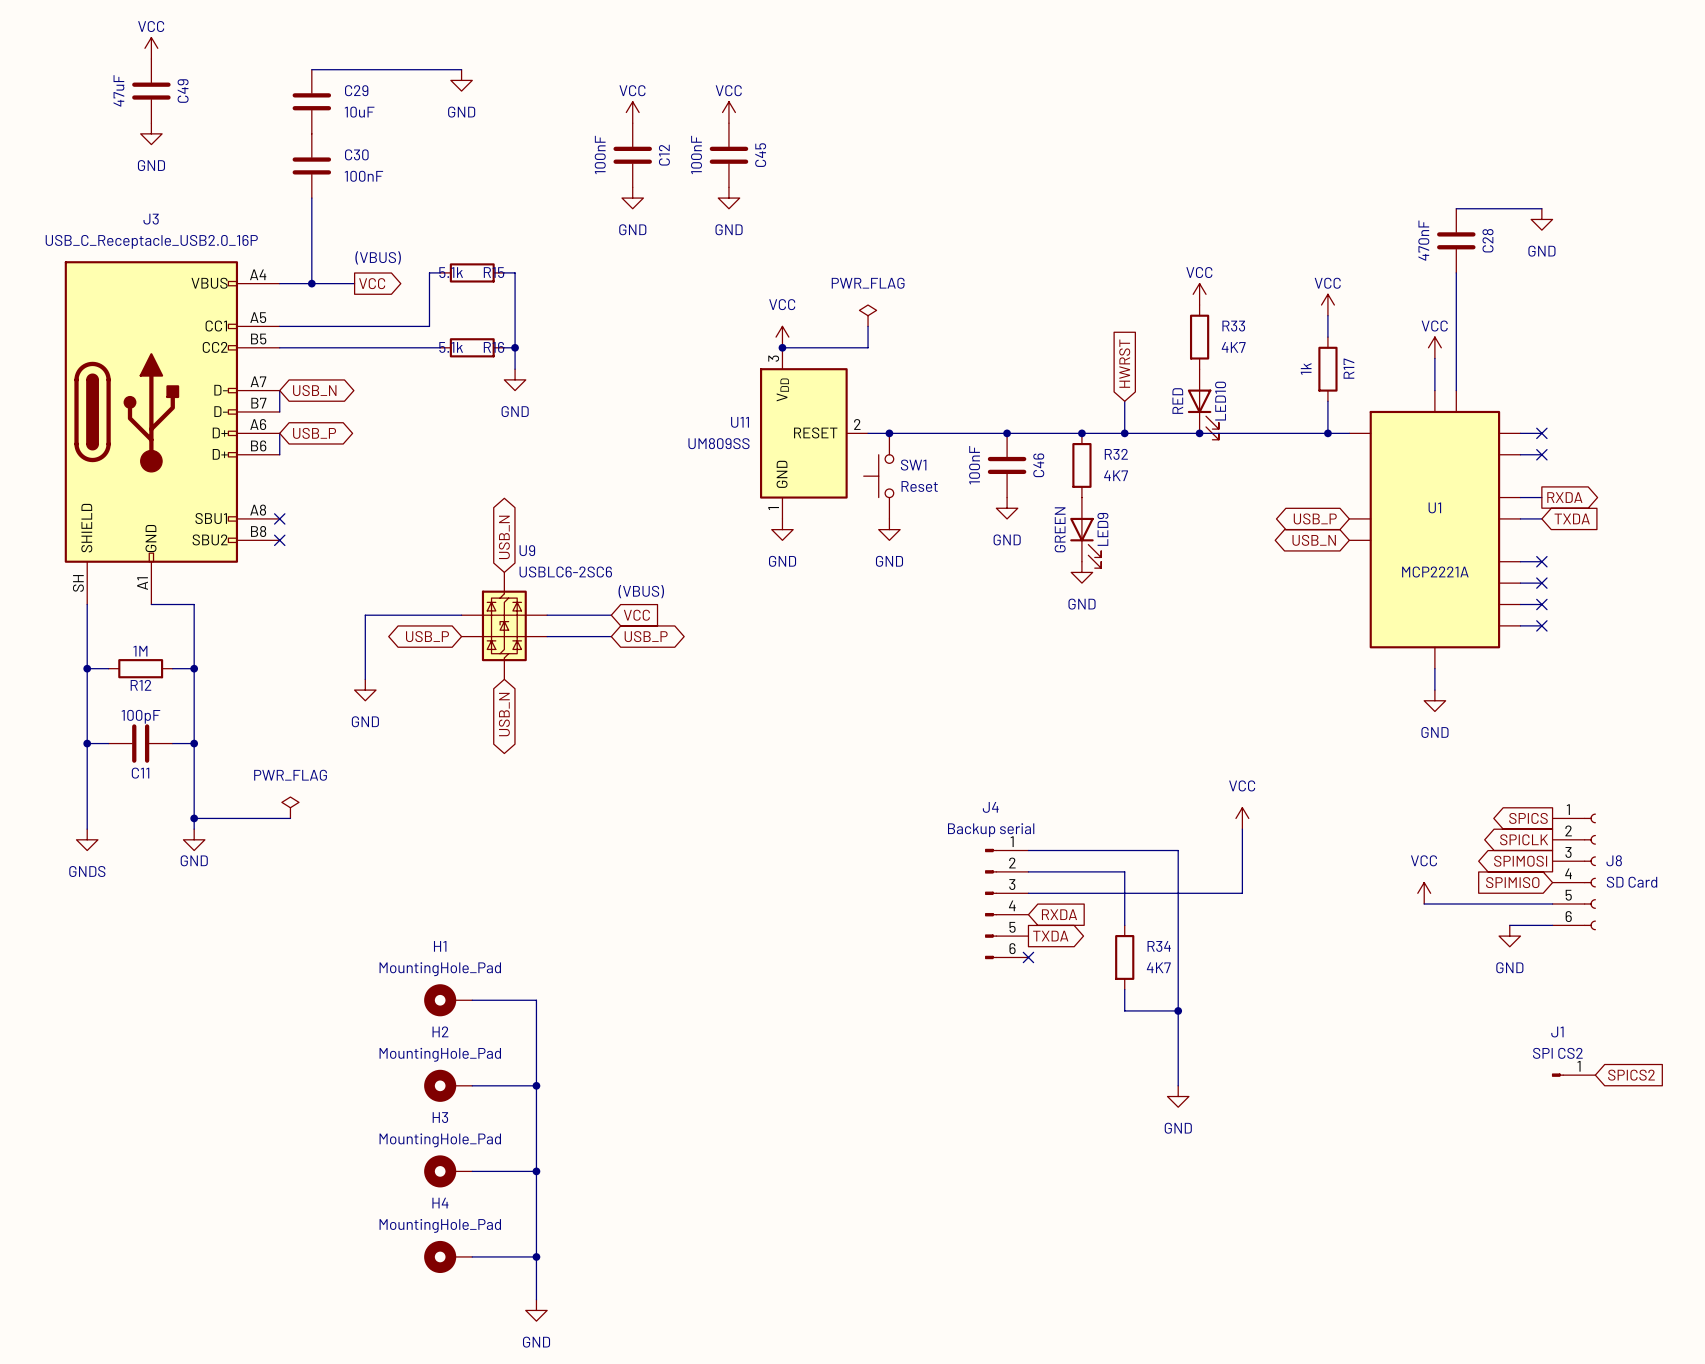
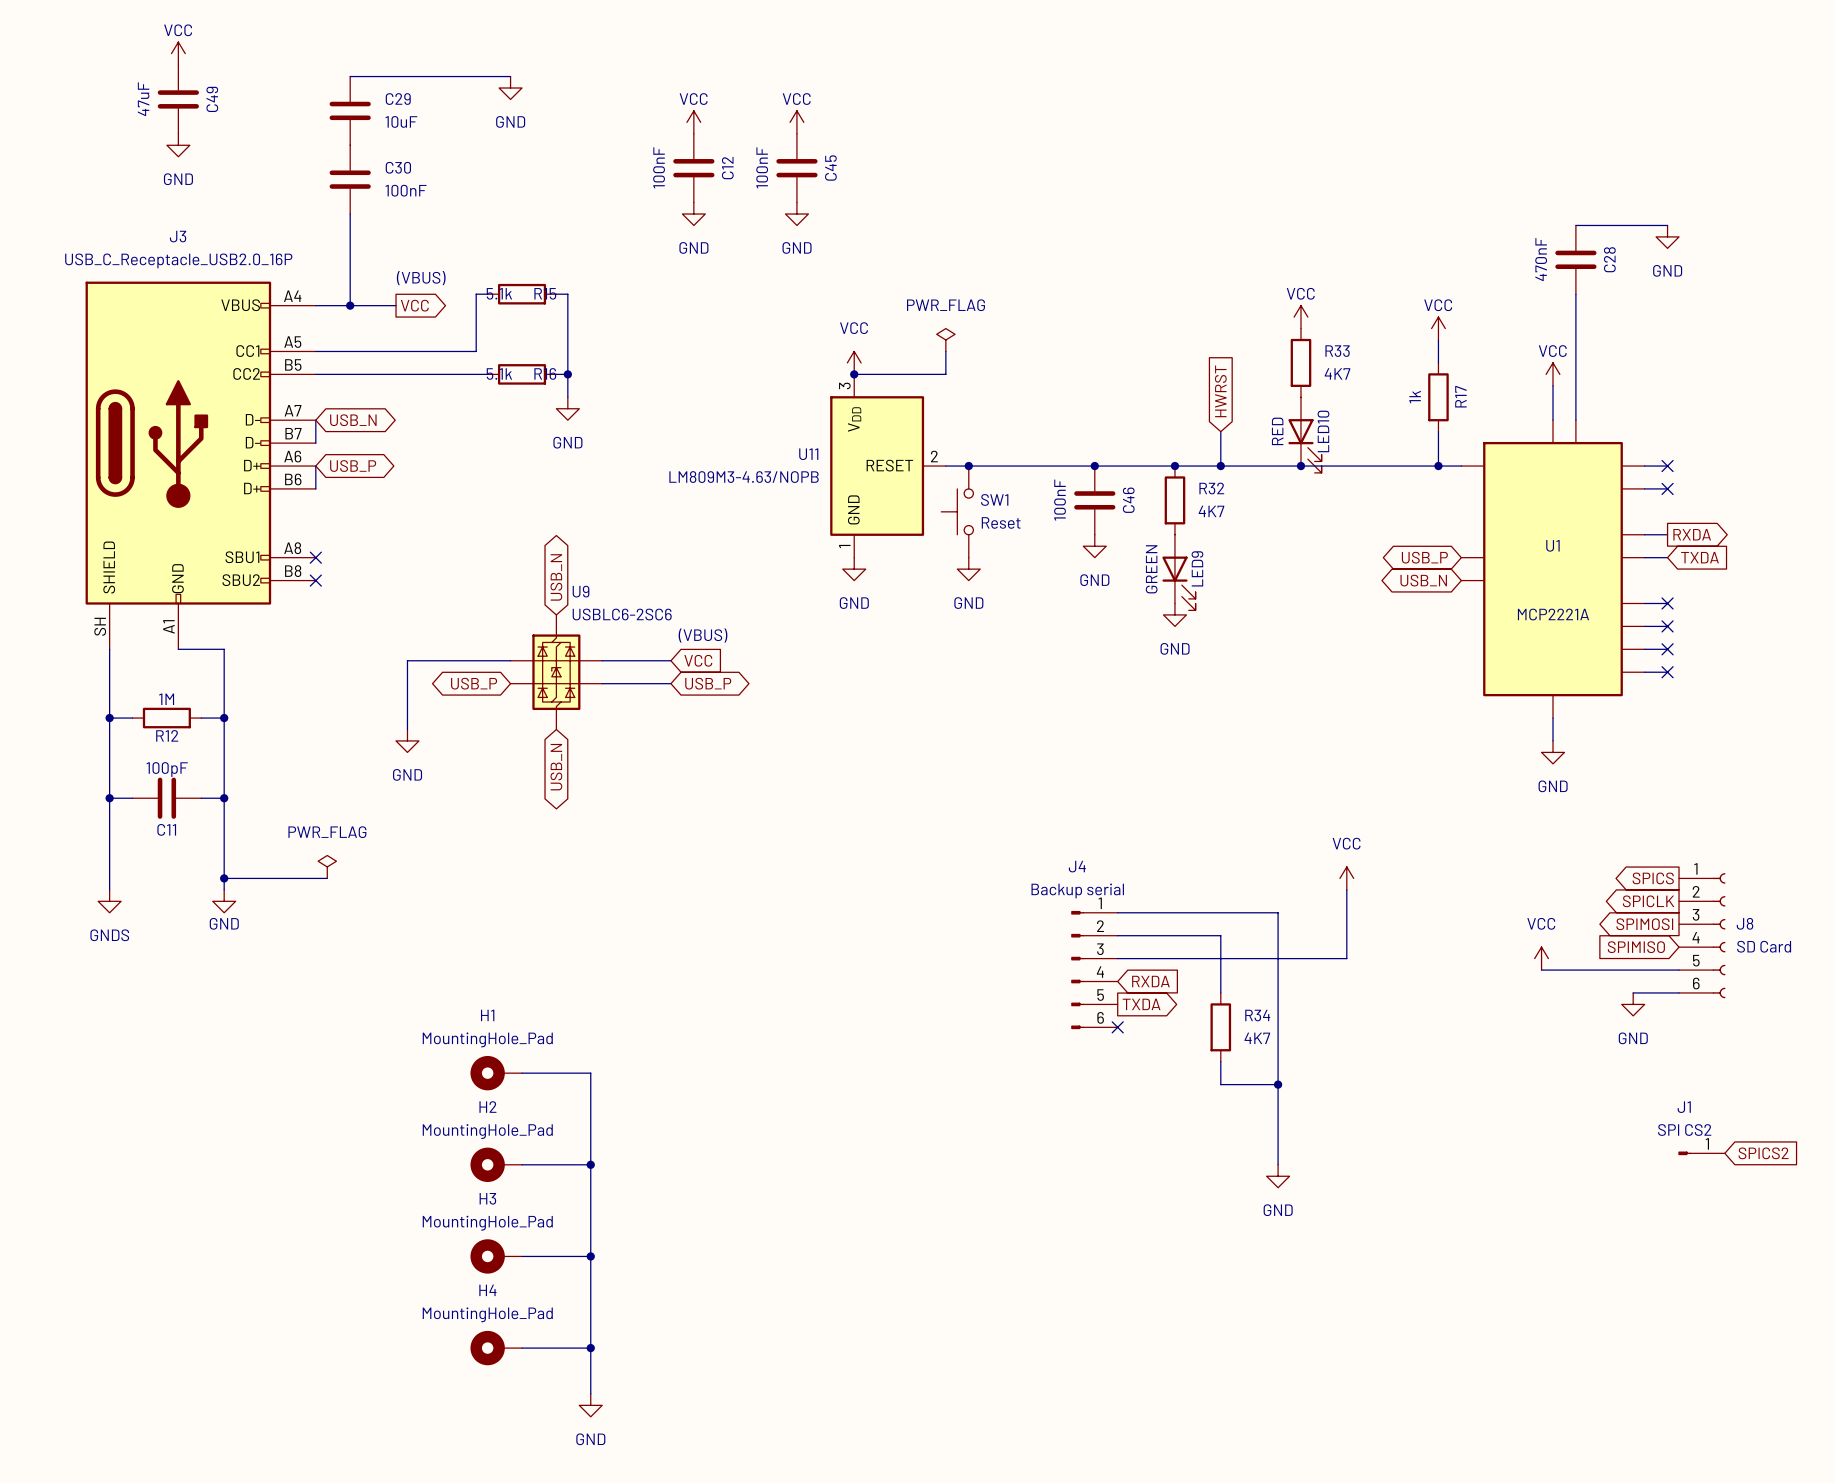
U11 value: UM809SS (718, 443) -> LM809M3-4.63/NOPB (744, 477)

